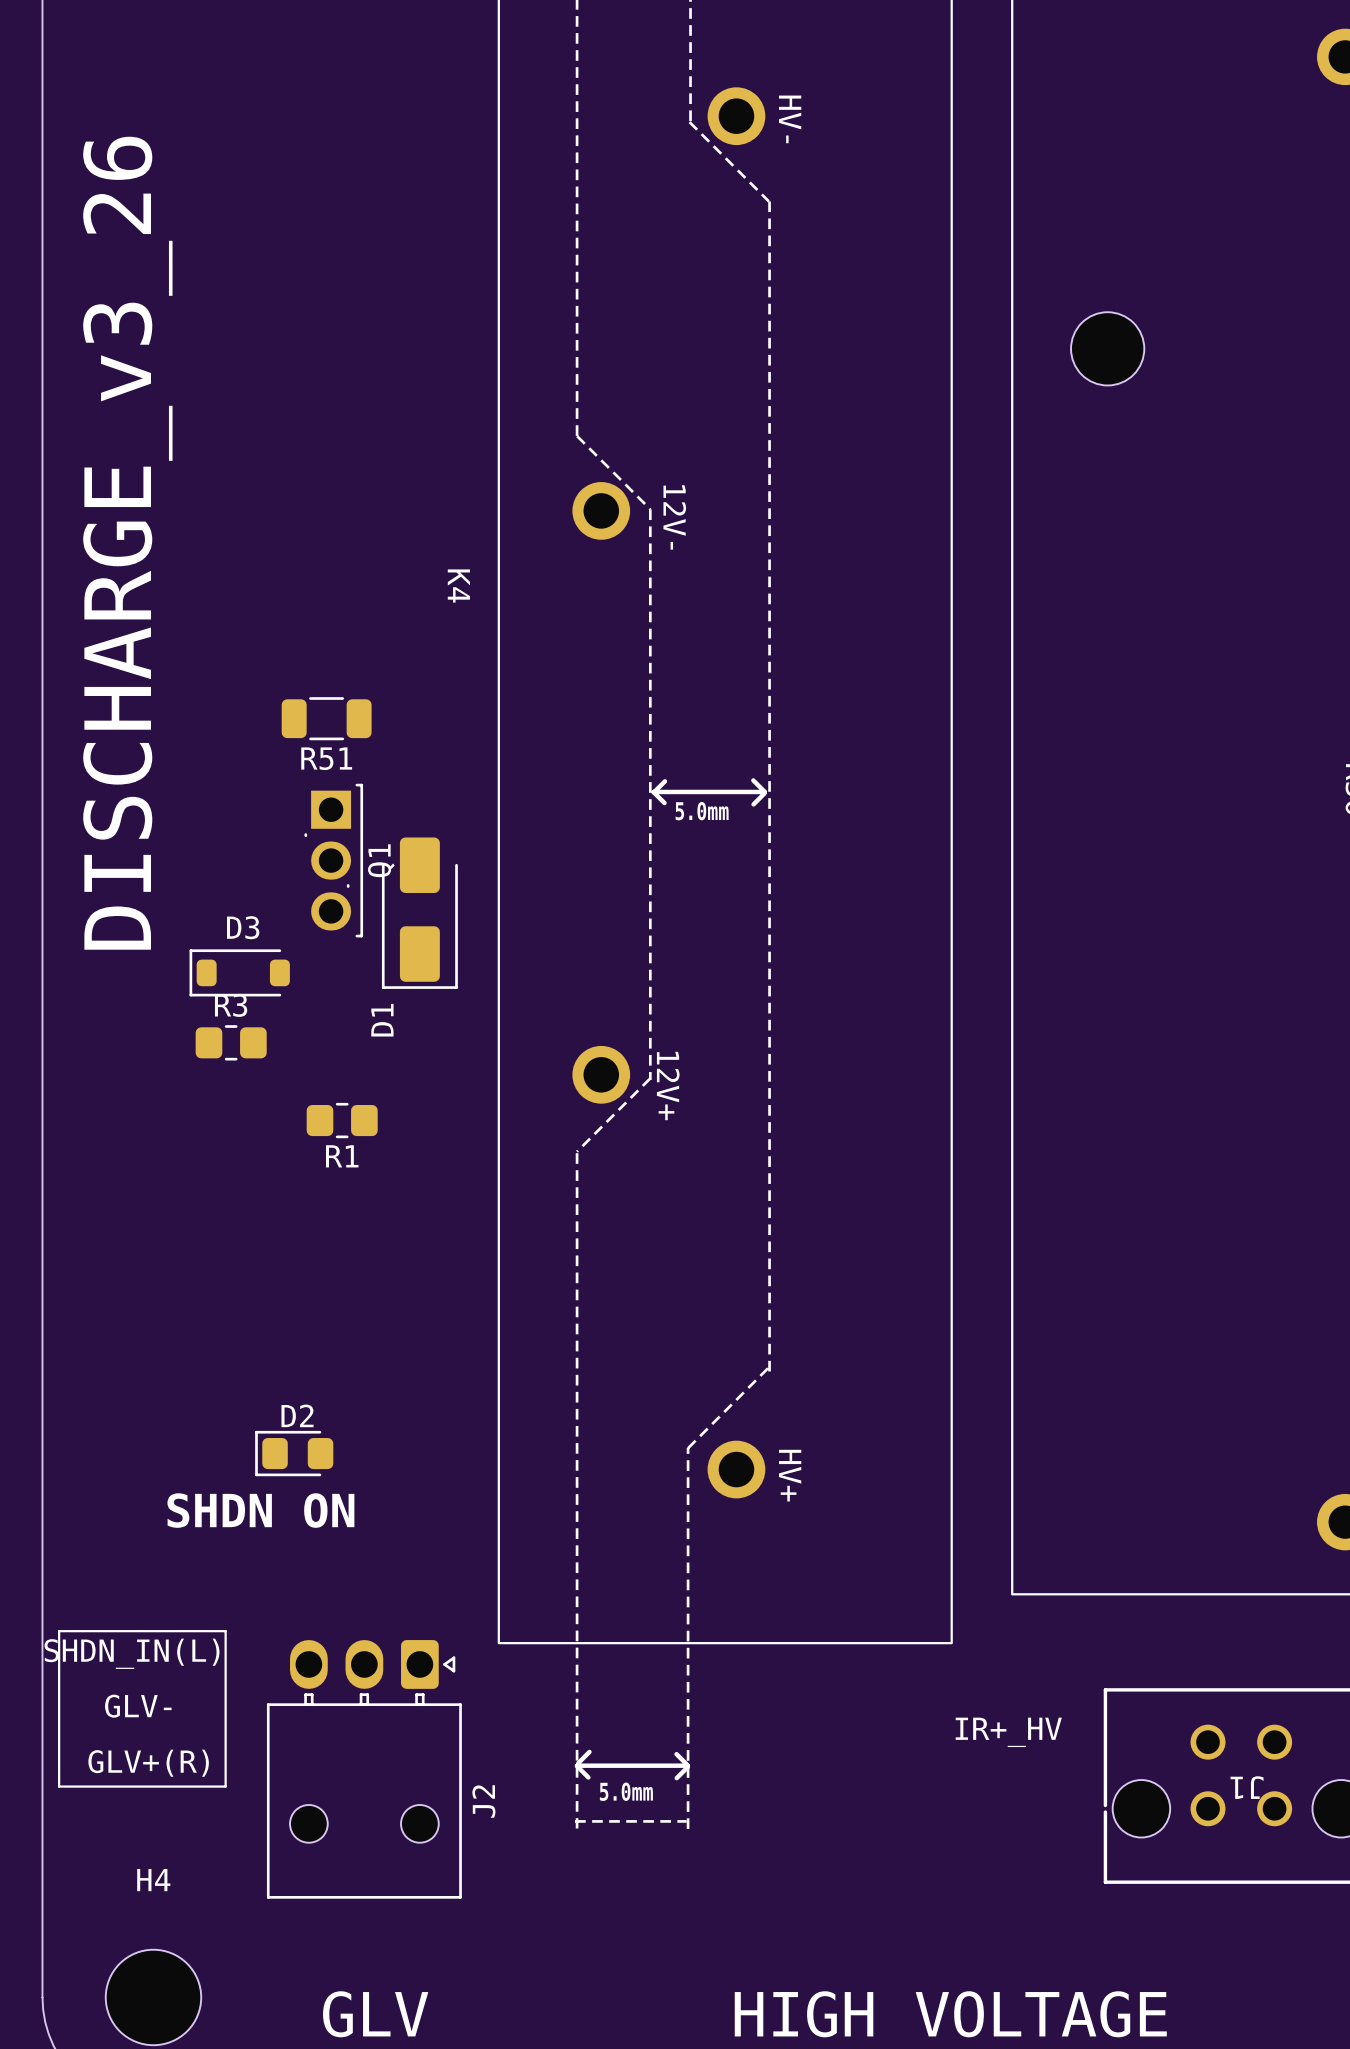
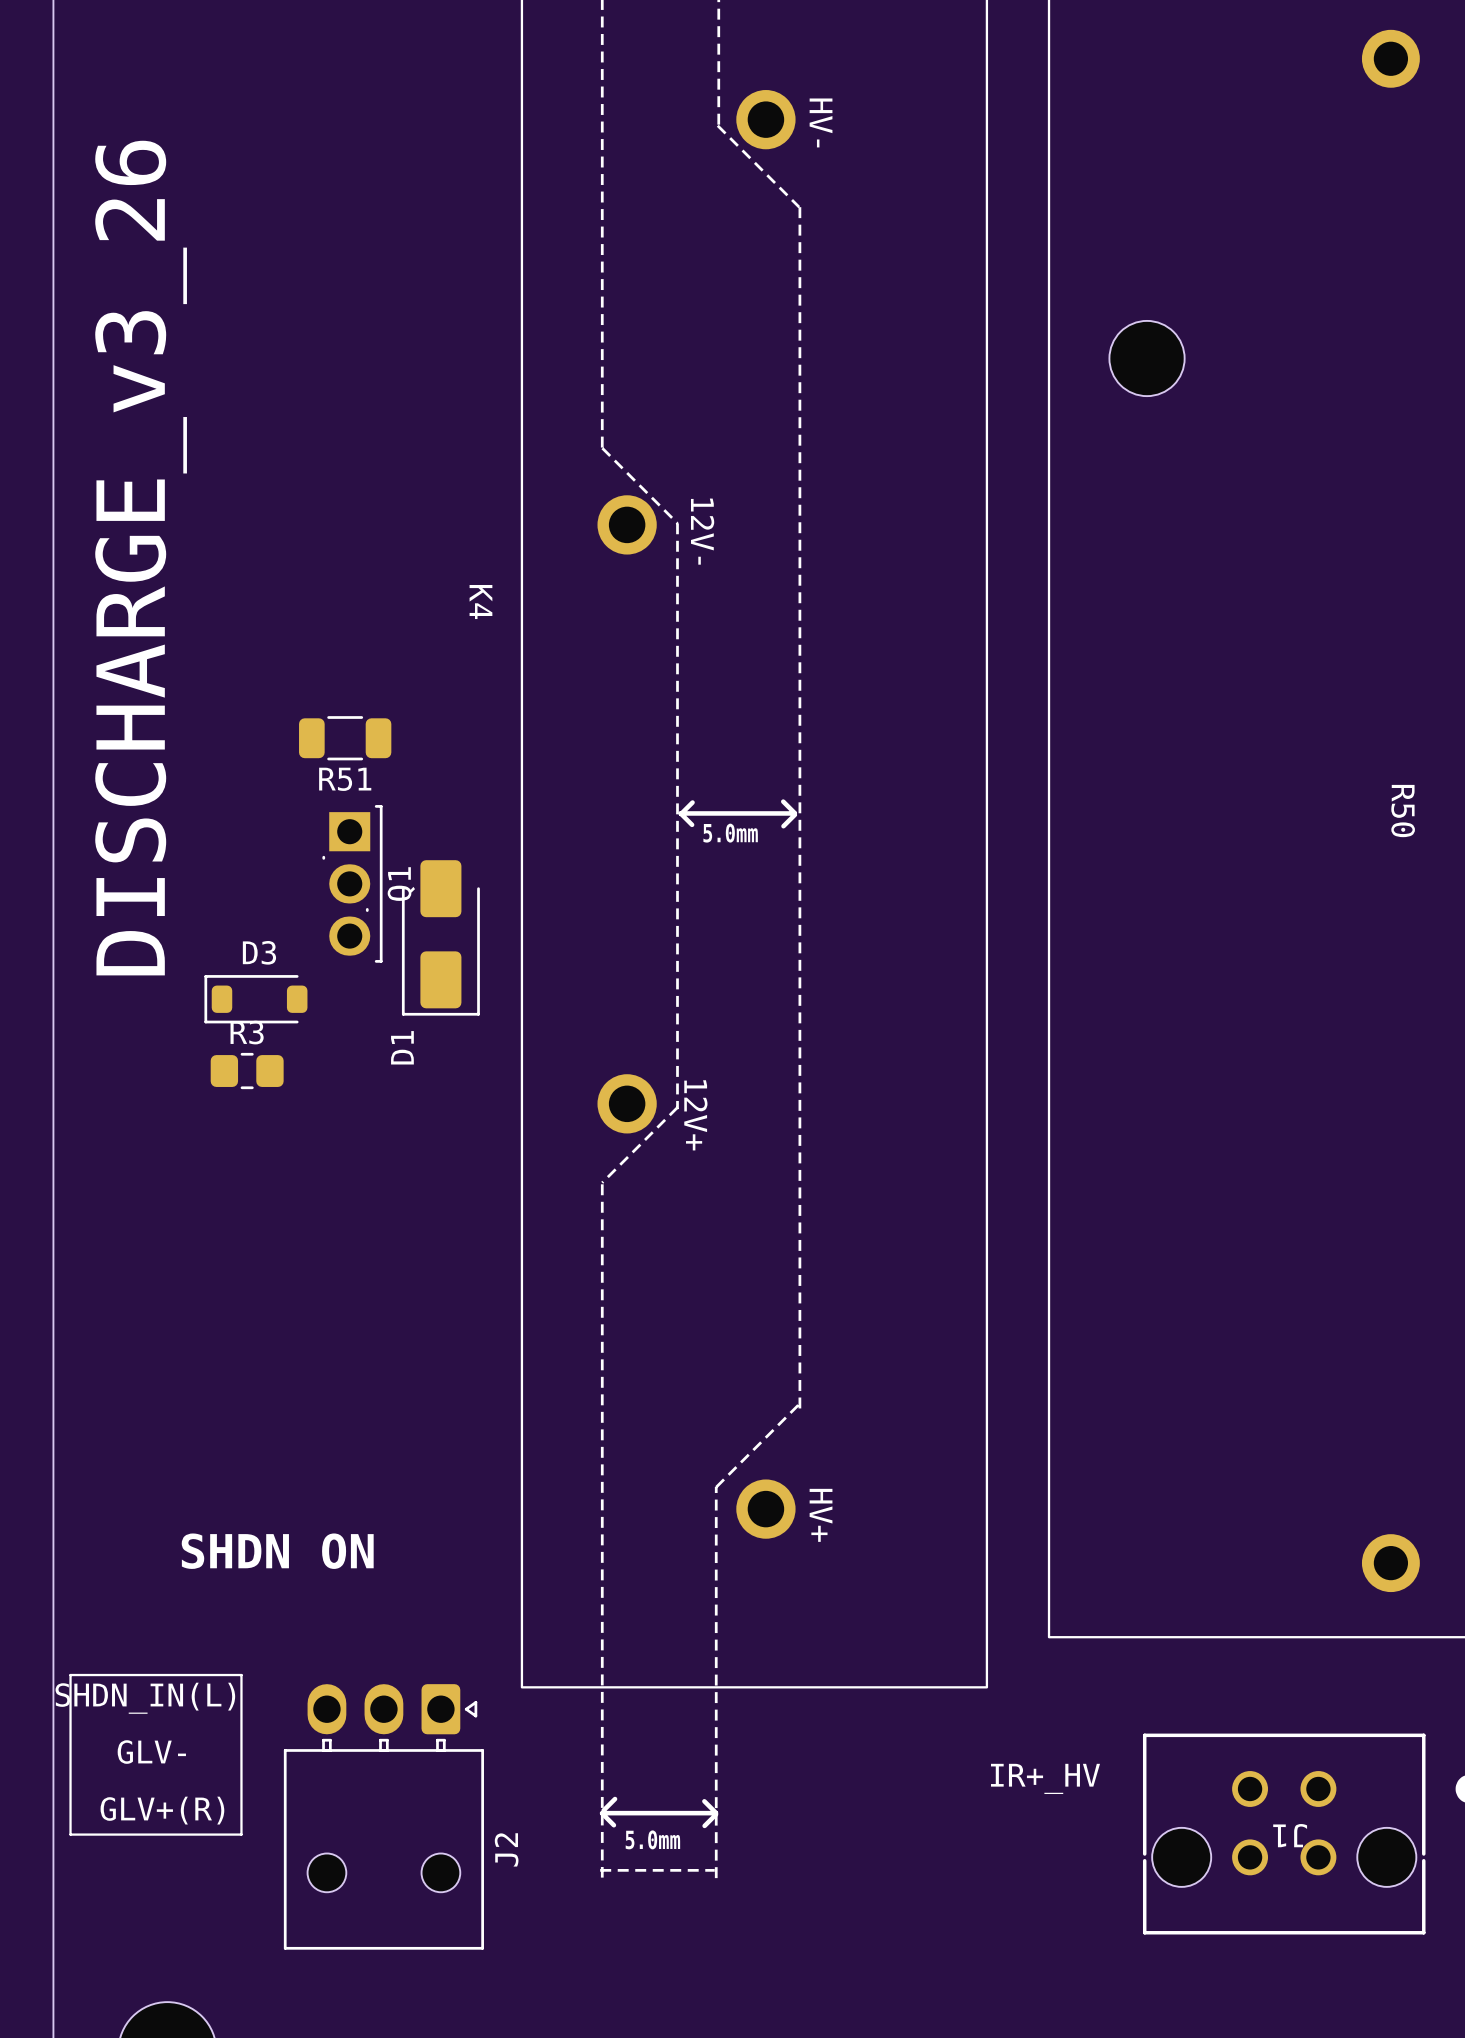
R1: (342, 1120) -> none
D2: (294, 1453) -> none
H4 name: H4 (153, 1880) -> none

